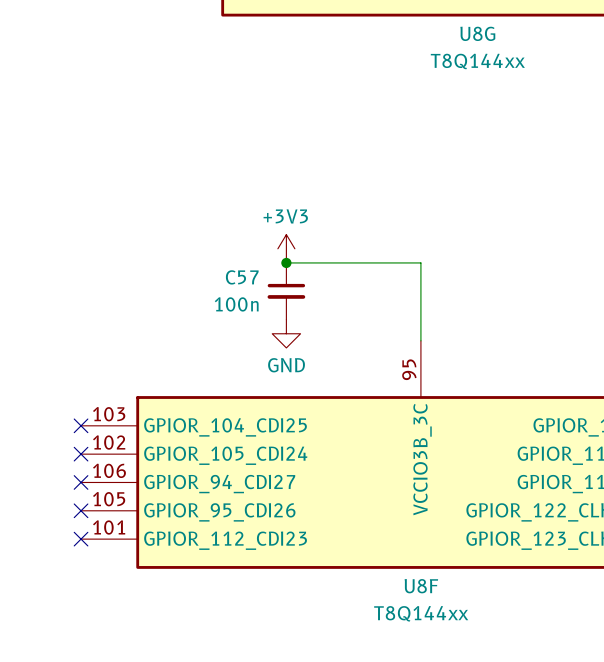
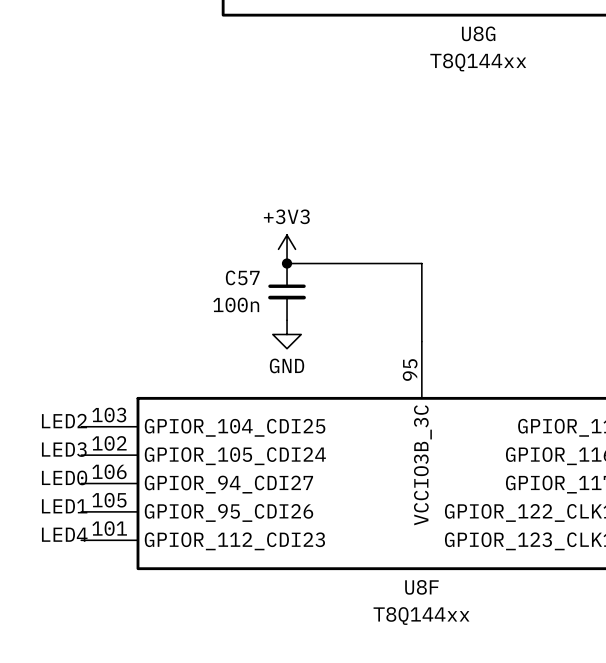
label: none -> LED2 (64, 421)
no-connect mark: (81, 425) -> none
label: none -> LED3 (64, 449)
no-connect mark: (81, 454) -> none
label: none -> LED0 (64, 477)
no-connect mark: (81, 482) -> none
label: none -> LED1 (64, 506)
no-connect mark: (81, 510) -> none
label: none -> LED4 (64, 534)
no-connect mark: (81, 539) -> none

